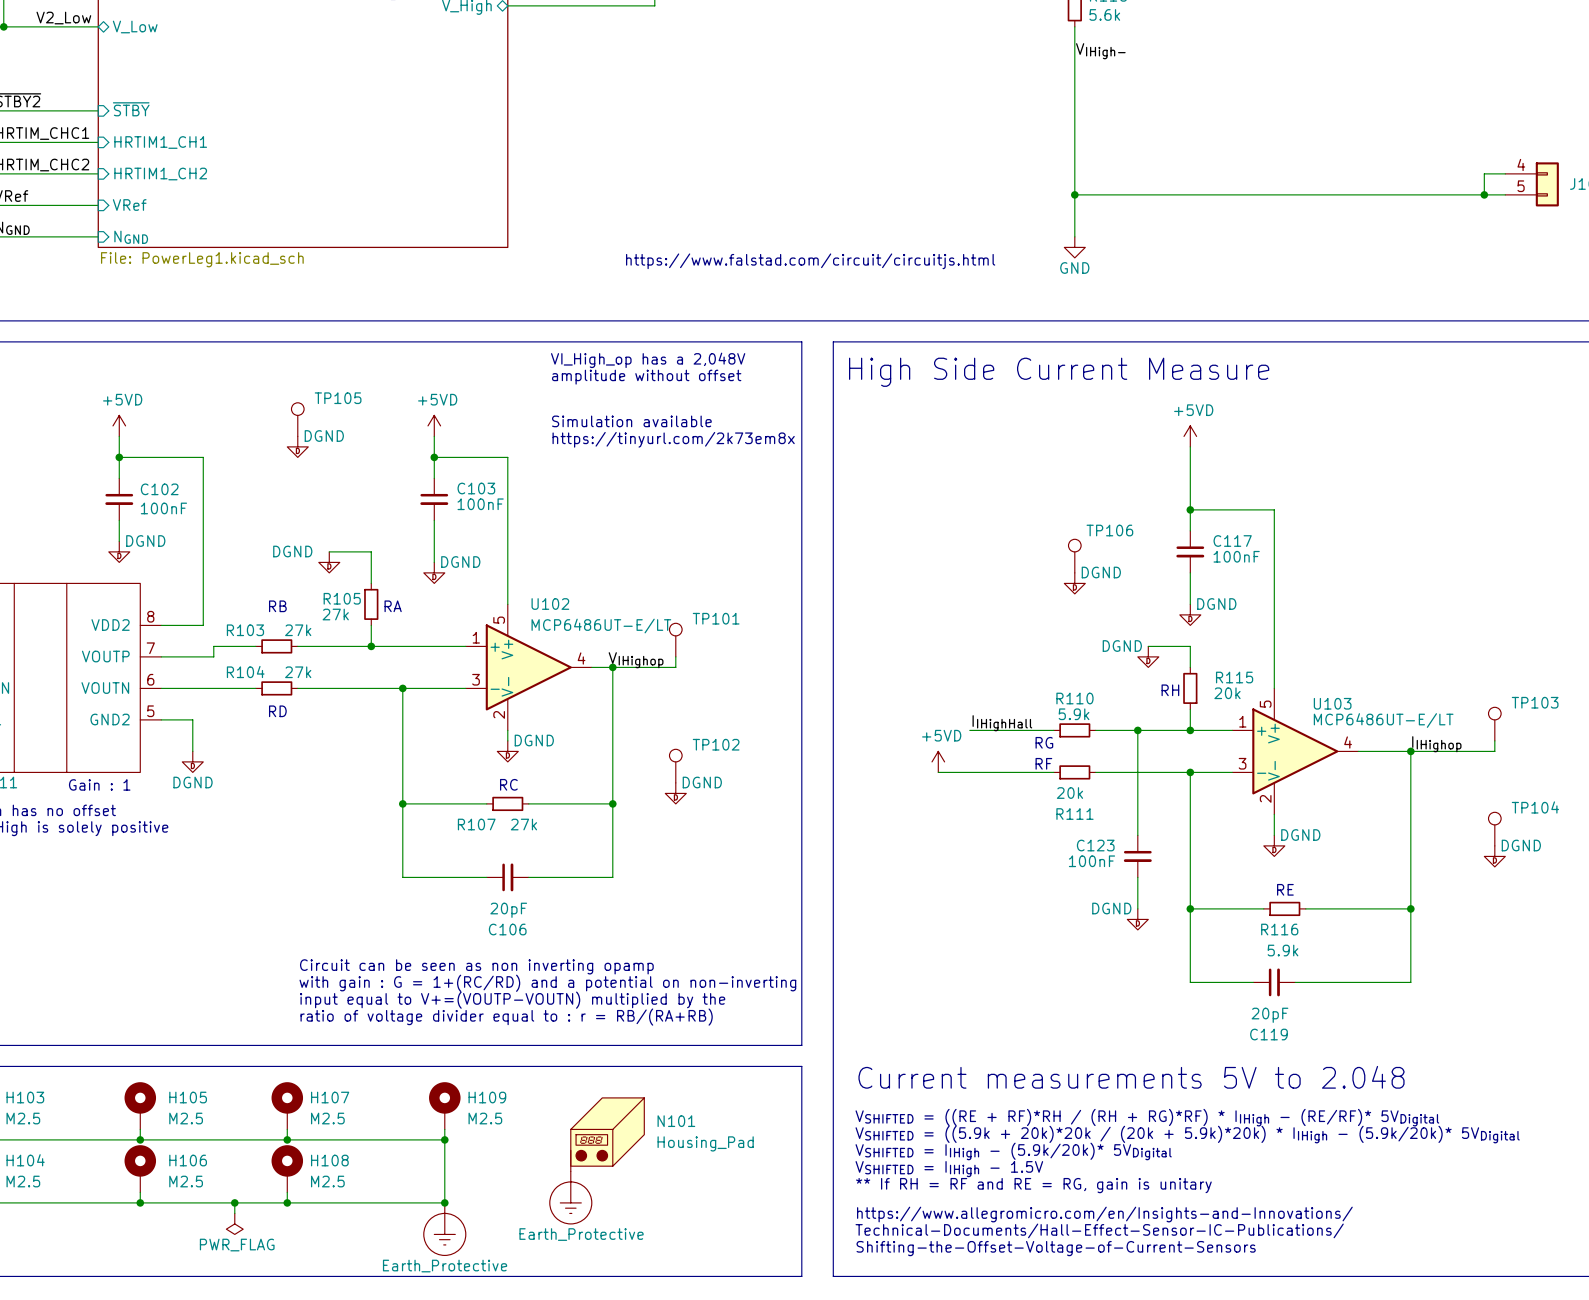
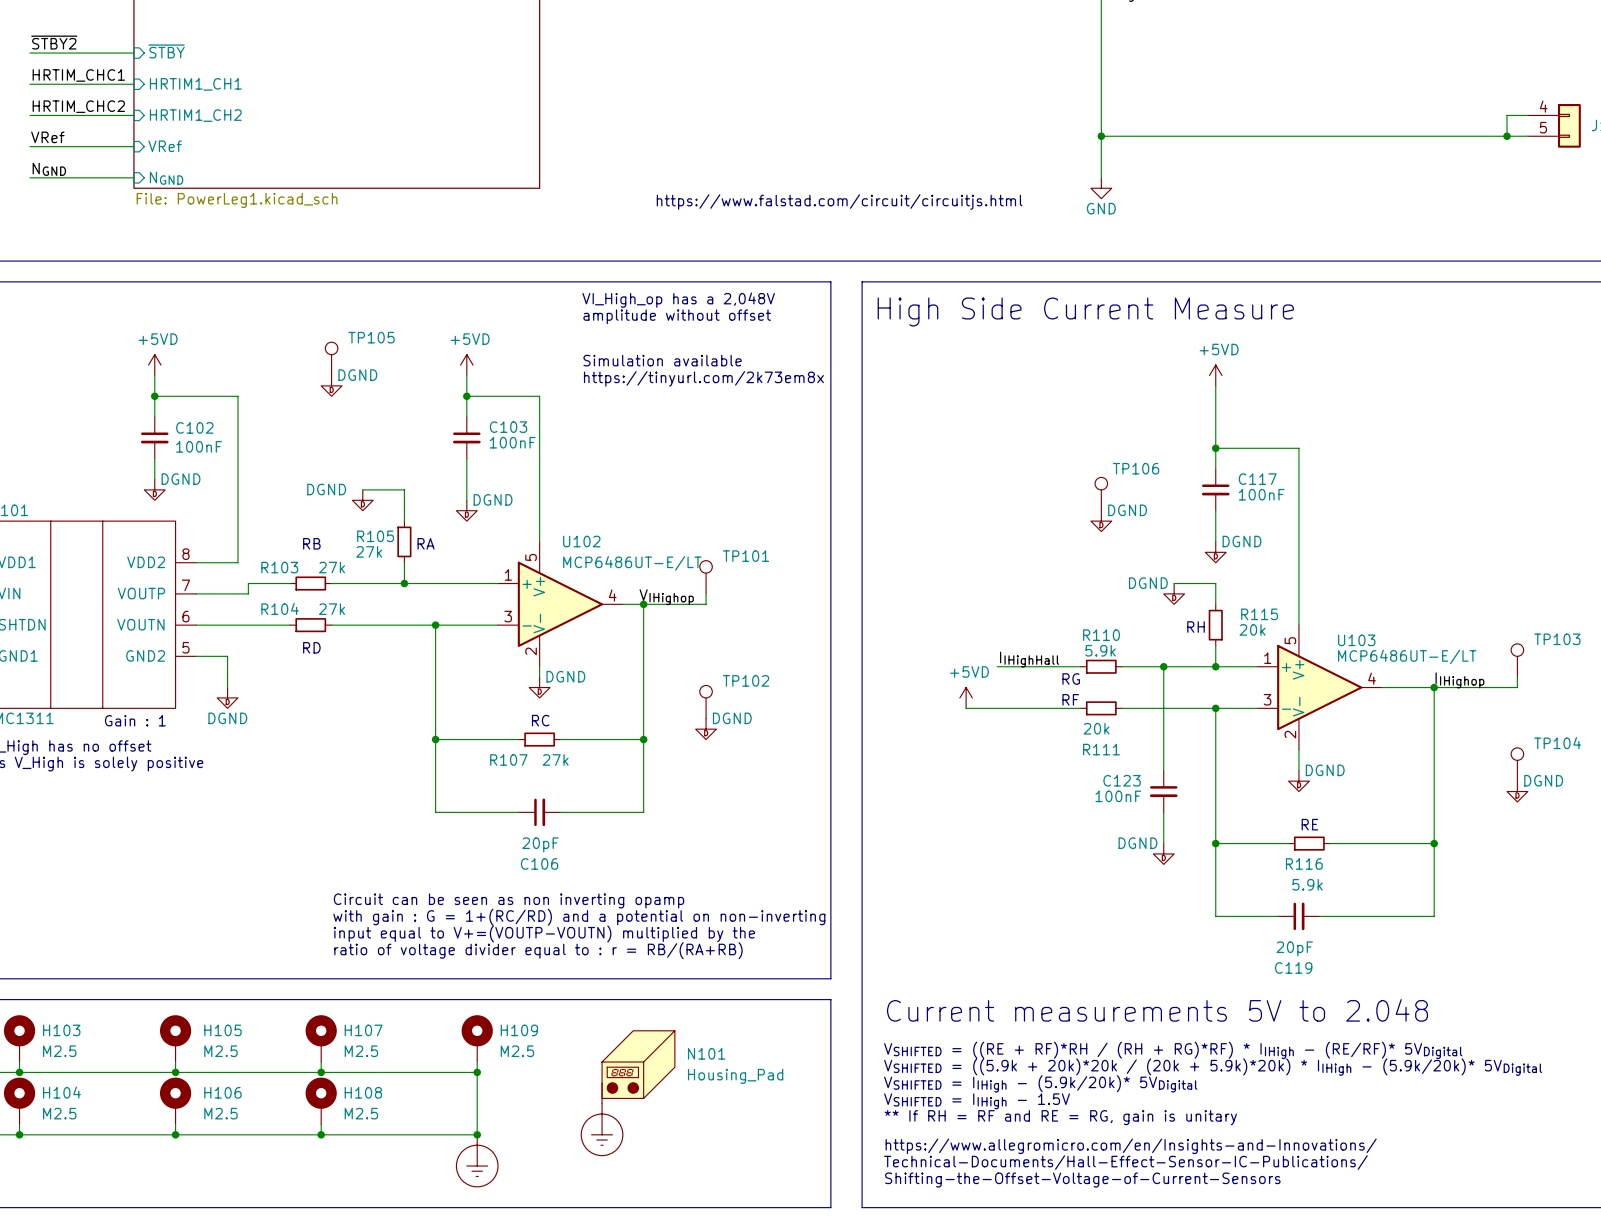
wire: (234, 1202) (234, 1213) -> none
junction: (234, 1202) -> none
power symbol: PWR_FLAG (234, 1223) -> none
power symbol text: Earth_Protective (581, 1234) -> none
power symbol text: Earth_Protective (445, 1266) -> none

